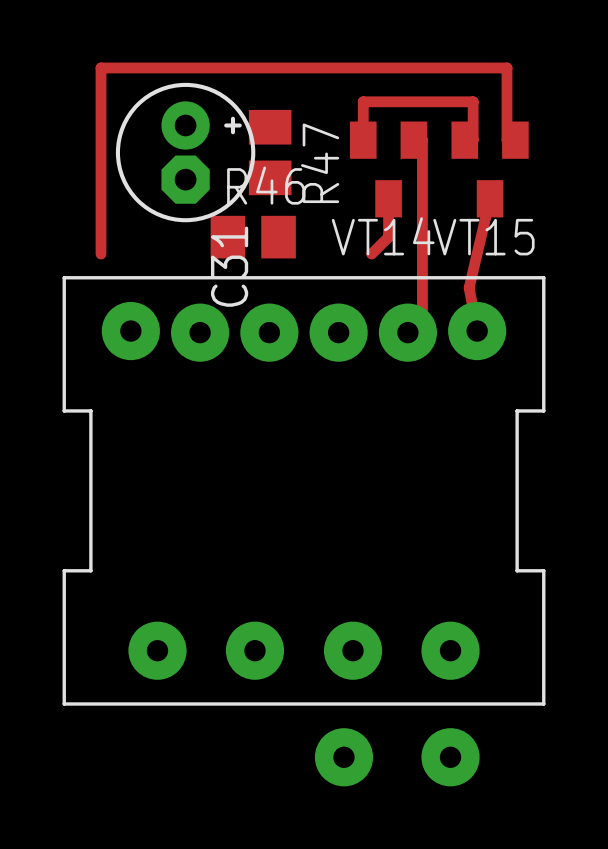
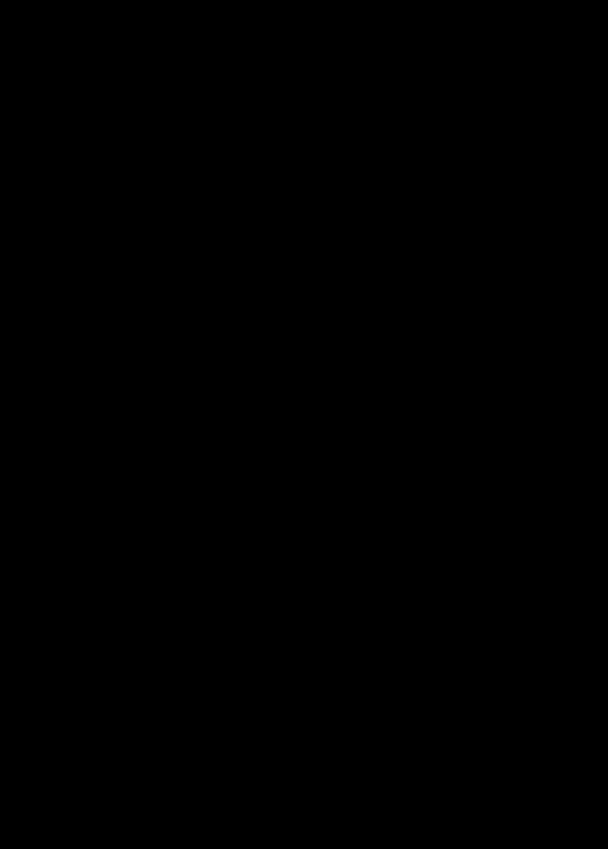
top track: (363, 140) (363, 101) (473, 101) (473, 140) (464, 140) -> none
top track: (413, 140) (422, 140) (422, 318) (407, 332) -> none
top track: (515, 140) (507, 140) (507, 67) (101, 67) (101, 254) -> none
C31: (185, 152) -> none
R47: (270, 152) -> none
VT14: (388, 169) -> none
VT15: (490, 169) -> none
top track: (388, 198) (388, 237) (371, 254) -> none
top track: (490, 198) (469, 287) (477, 331) -> none
R46: (253, 237) -> none
part: (304, 531) -> none

